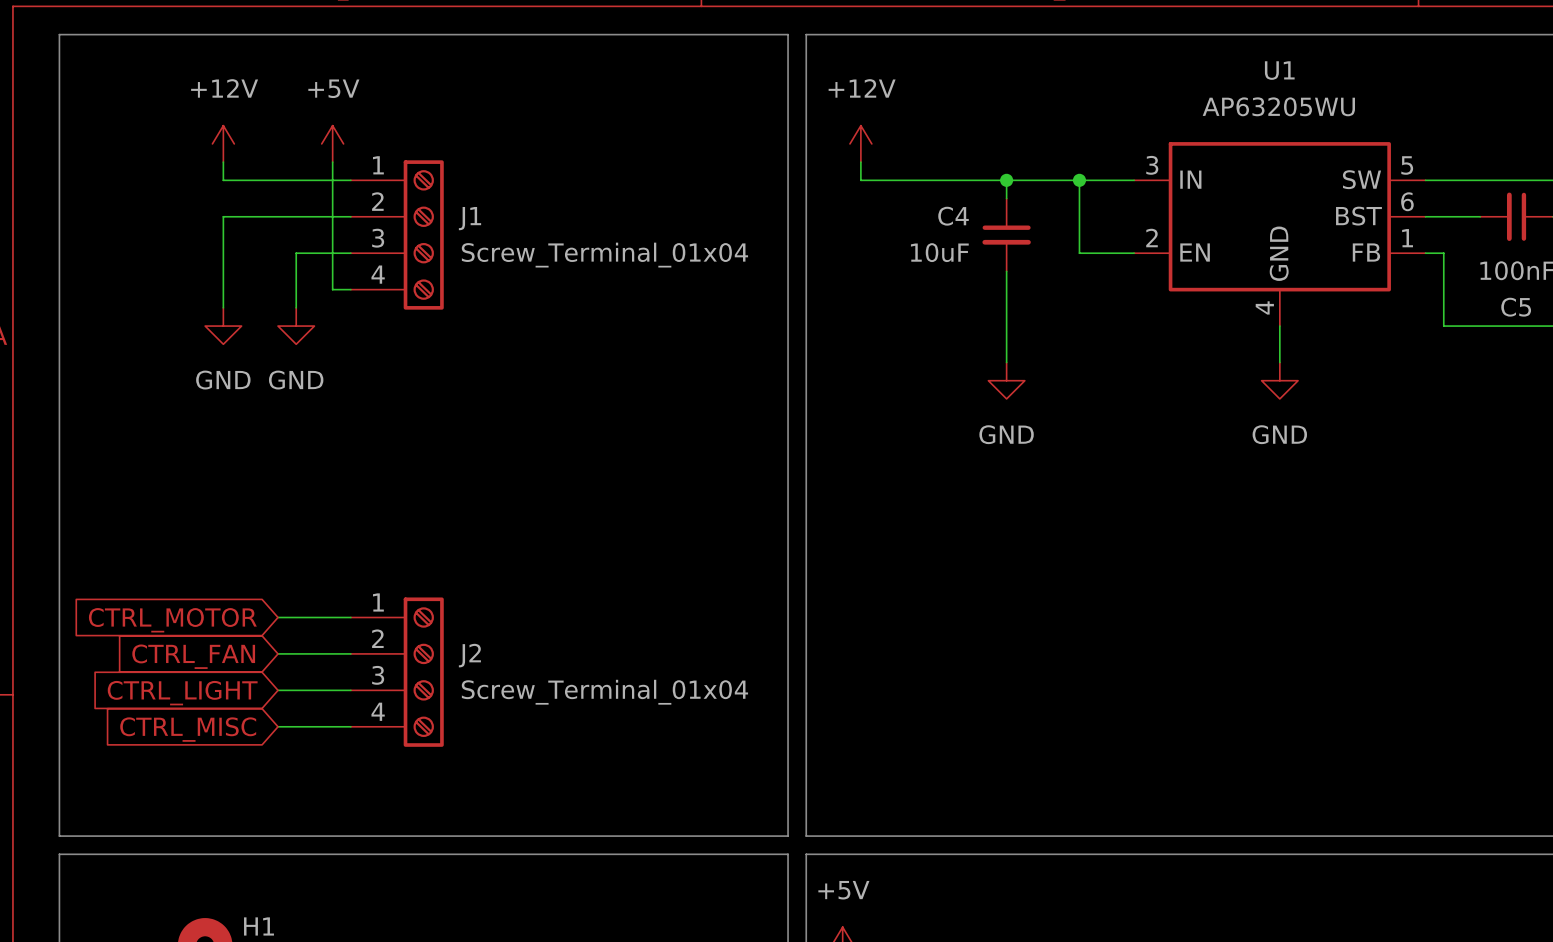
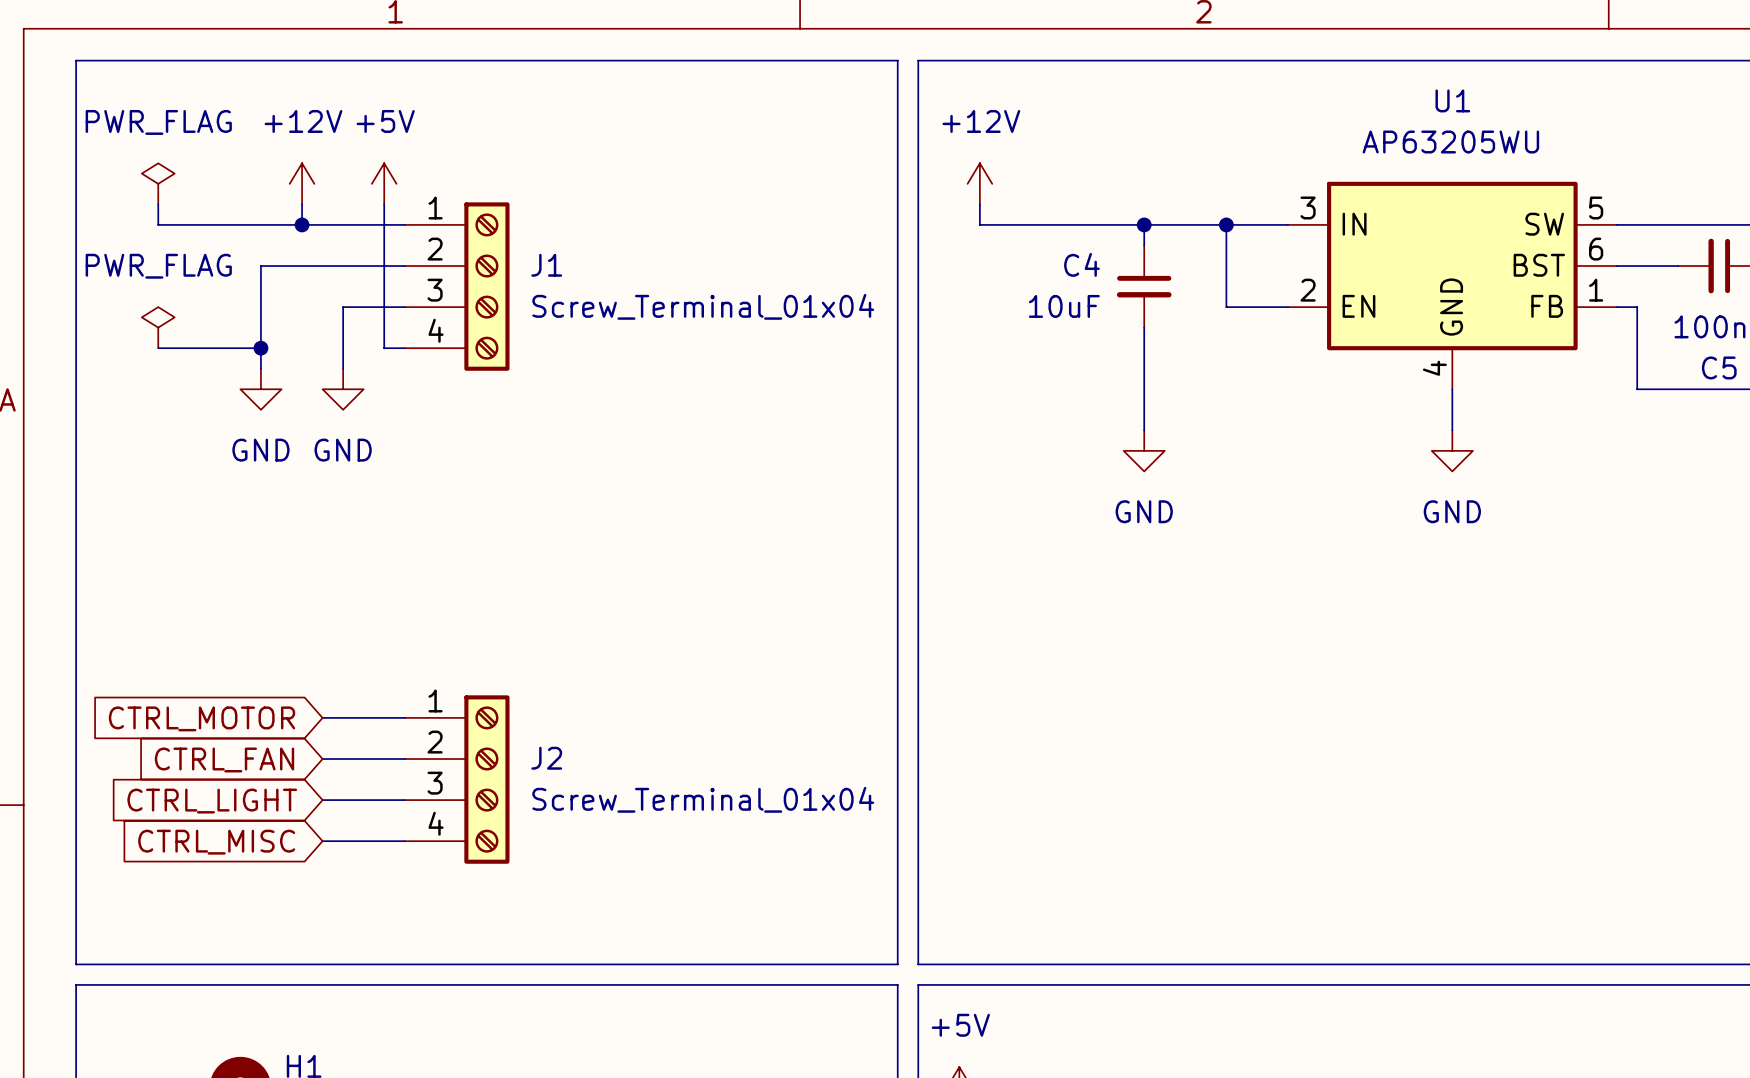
power symbol: none -> PWR_FLAG (158, 183)
power symbol position: +12V (223, 143) -> +12V (302, 183)
wire: (223, 162) (223, 180) -> (158, 204) (158, 224) (260, 224)
wire: none -> (302, 204) (302, 224)
junction: none -> (302, 224)
power symbol: none -> PWR_FLAG (158, 327)
wire: none -> (158, 348) (260, 348)
junction: none -> (260, 348)

